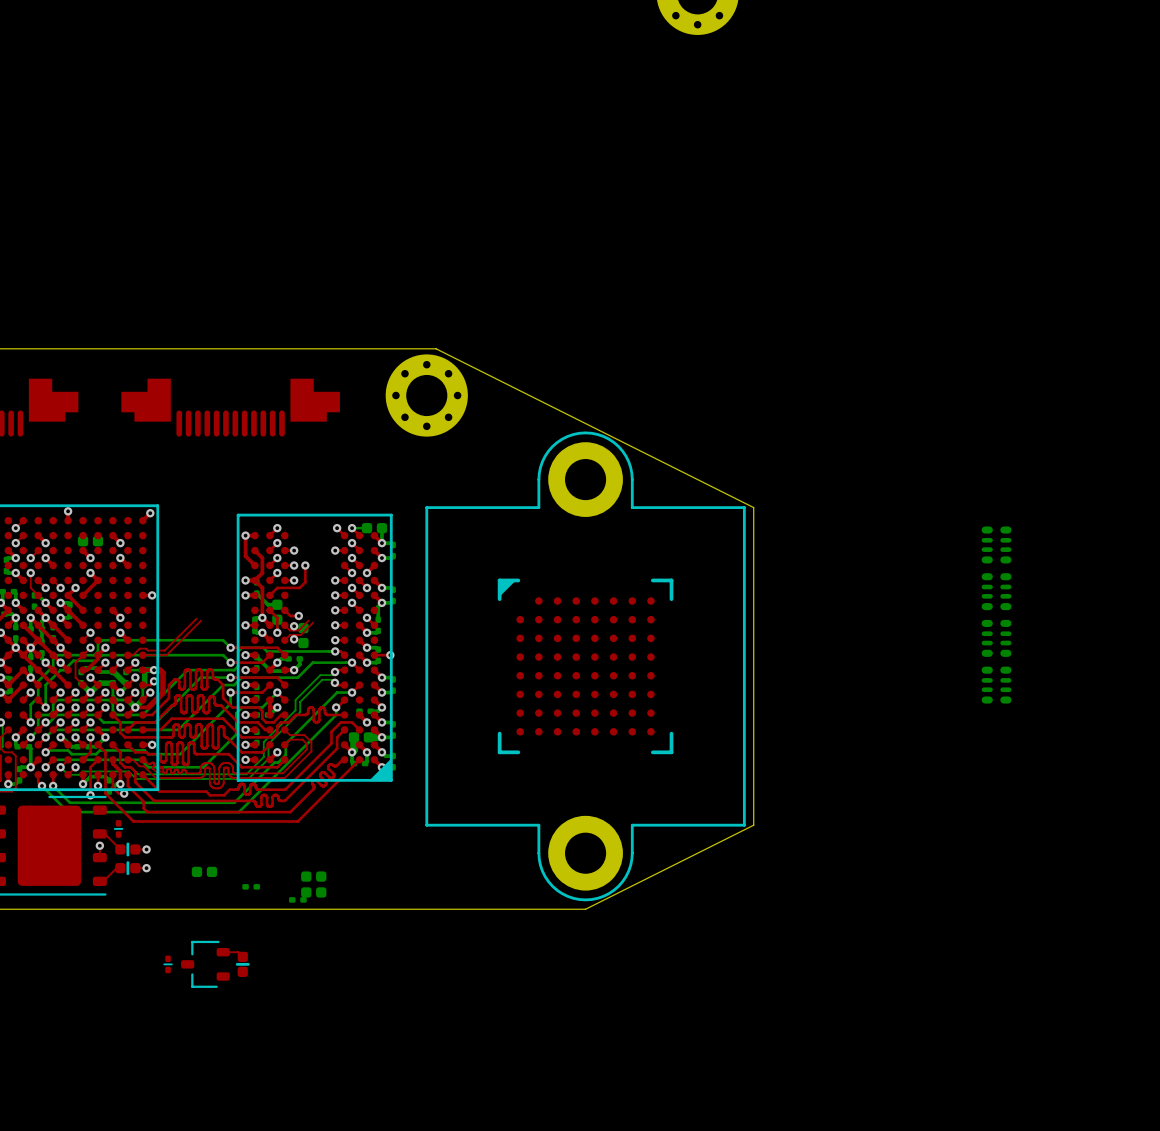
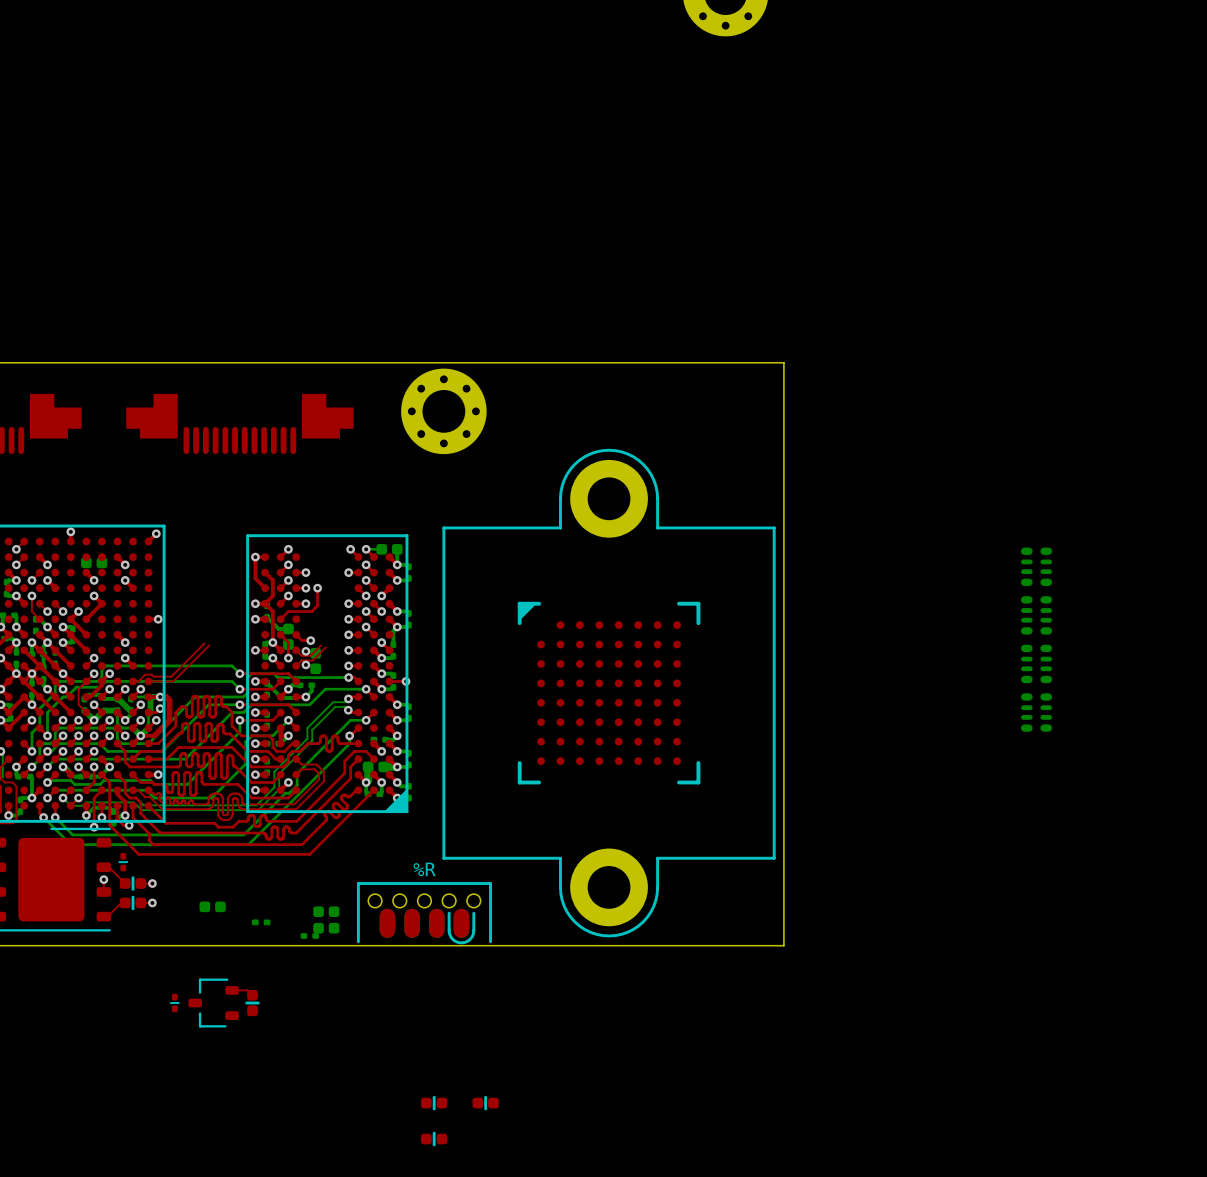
board edge: (436, 348) (753, 507) -> (453, 362) (783, 362) (783, 527)
board edge: (753, 825) (585, 909) -> (783, 858) (783, 945) (609, 945)
%R: none -> (424, 913)
part: none -> (434, 1103)
part: none -> (485, 1103)
part: none -> (434, 1139)

